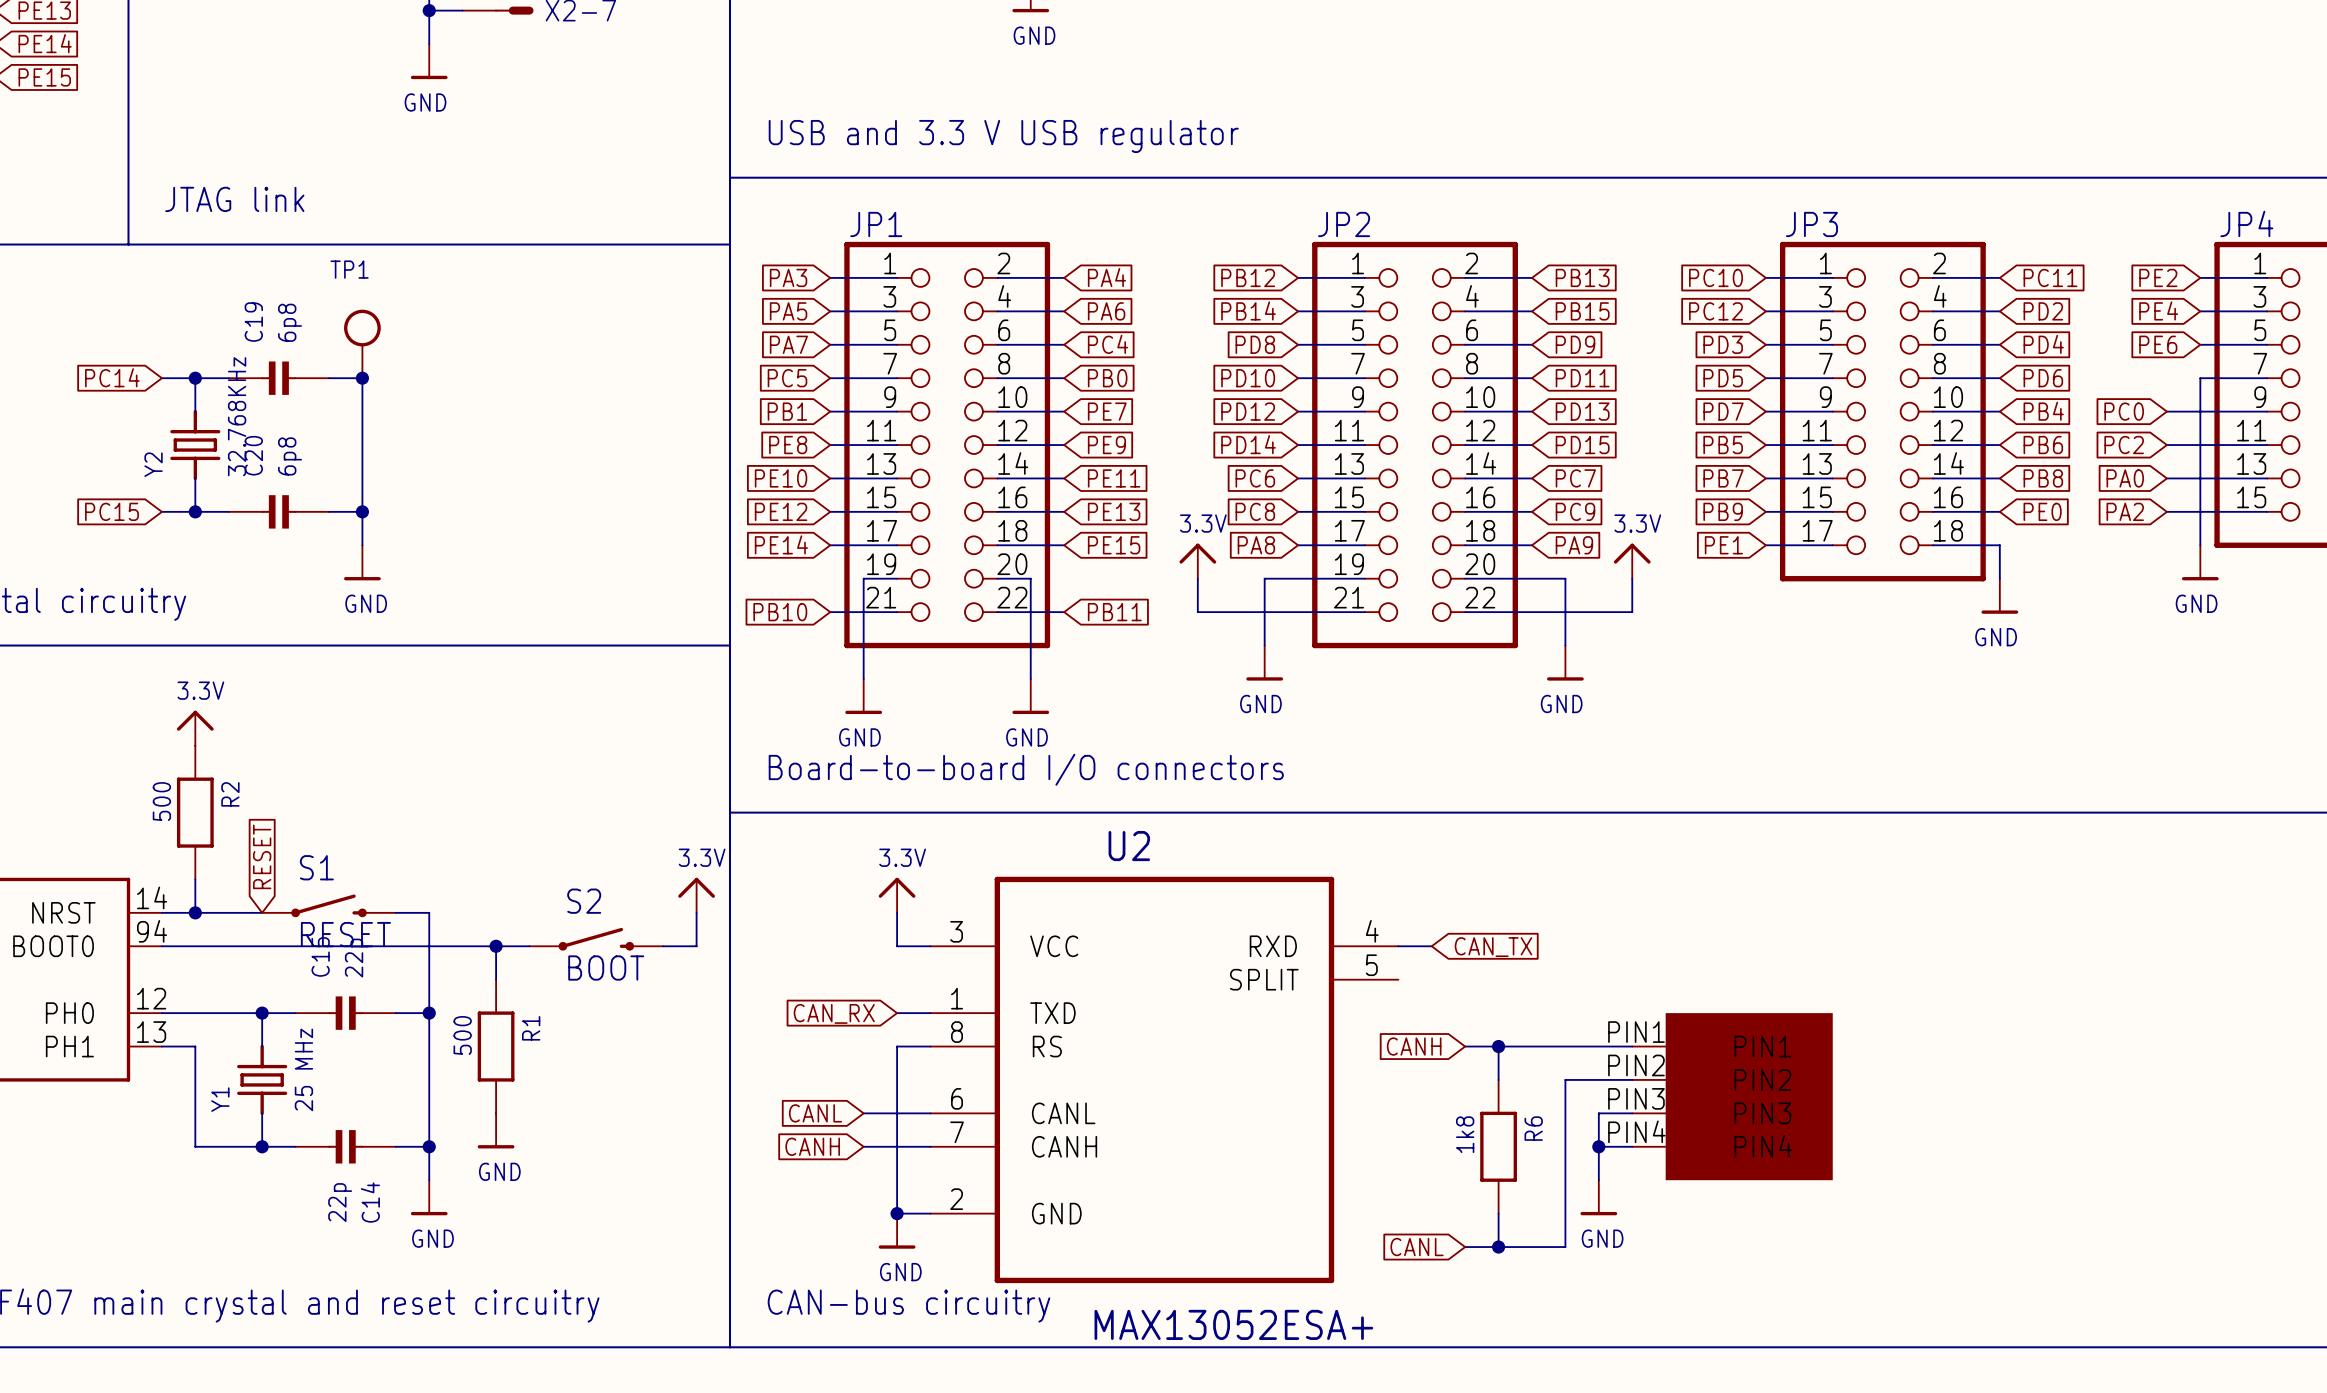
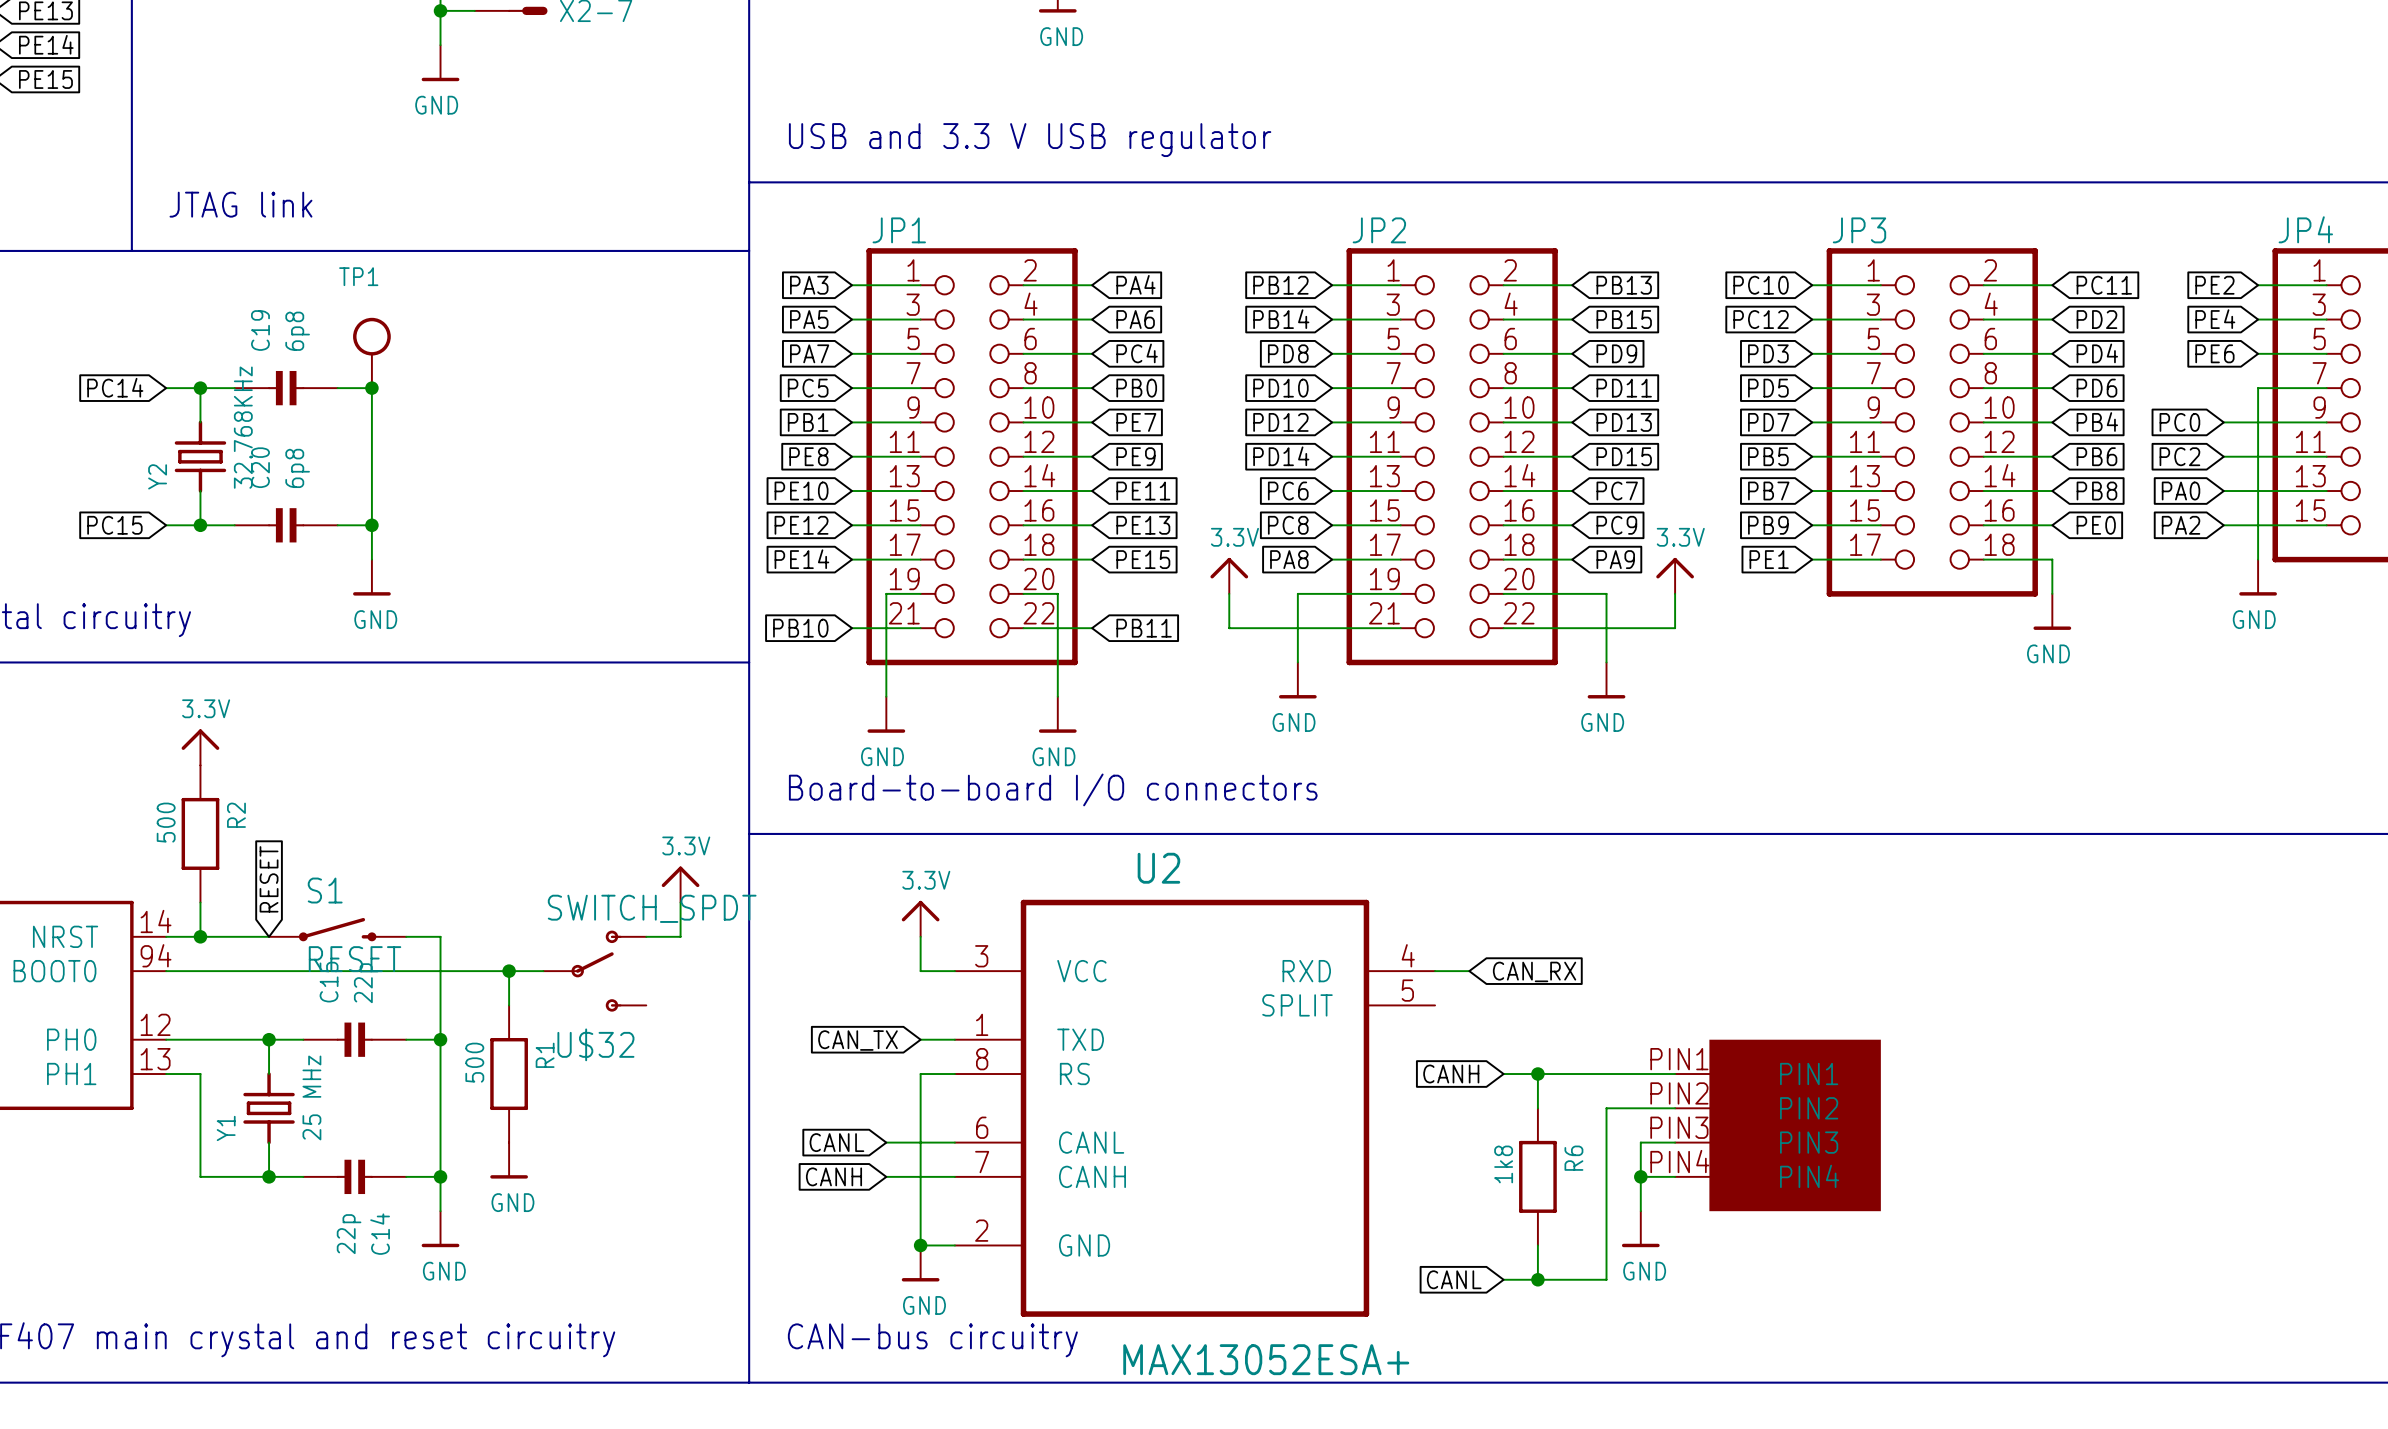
power symbol position: 3.3V (696, 895) -> 3.3V (680, 884)
wire: (696, 912) (696, 946) (663, 946) -> (680, 902) (680, 936) (646, 936)
S2: BOOT (596, 939) -> none
U$32: none -> SWITCH_SPDT (594, 971)
global label: CAN_TX (1493, 947) -> CAN_RX (1534, 971)
global label: CAN_RX (834, 1013) -> CAN_TX (858, 1040)

